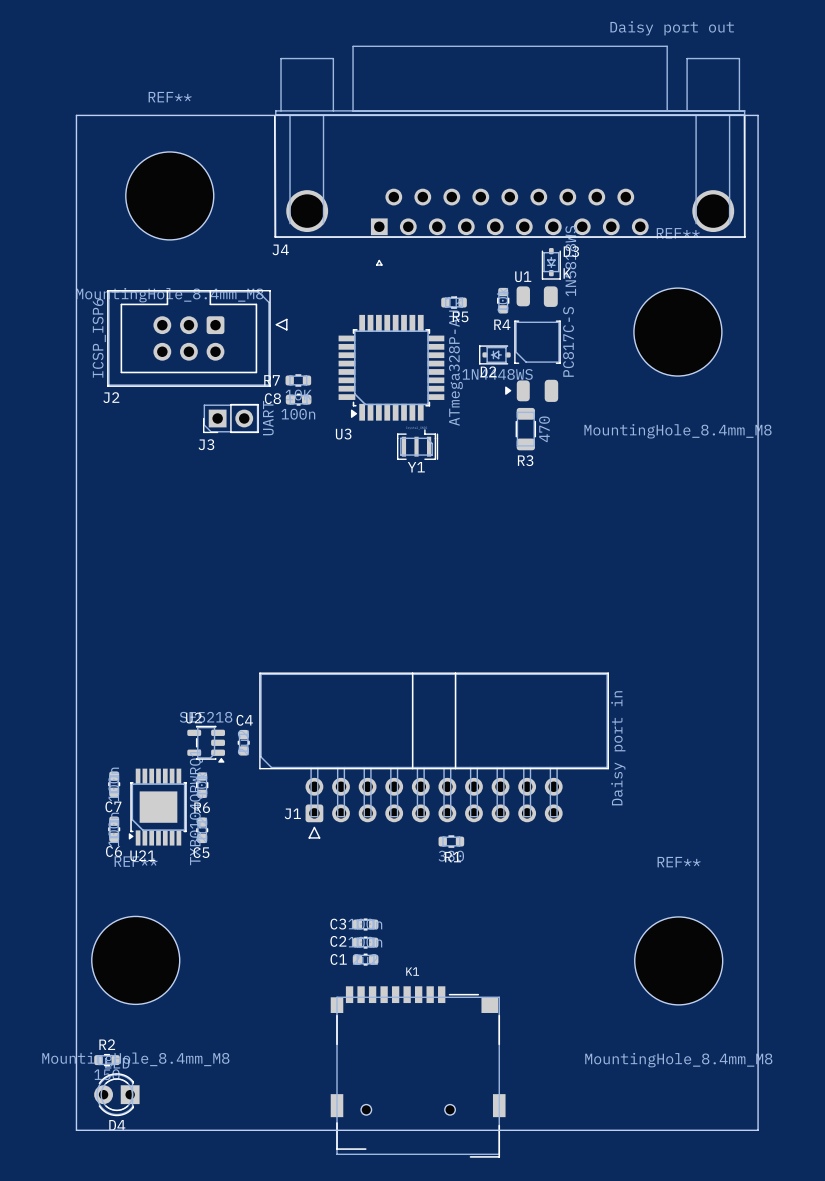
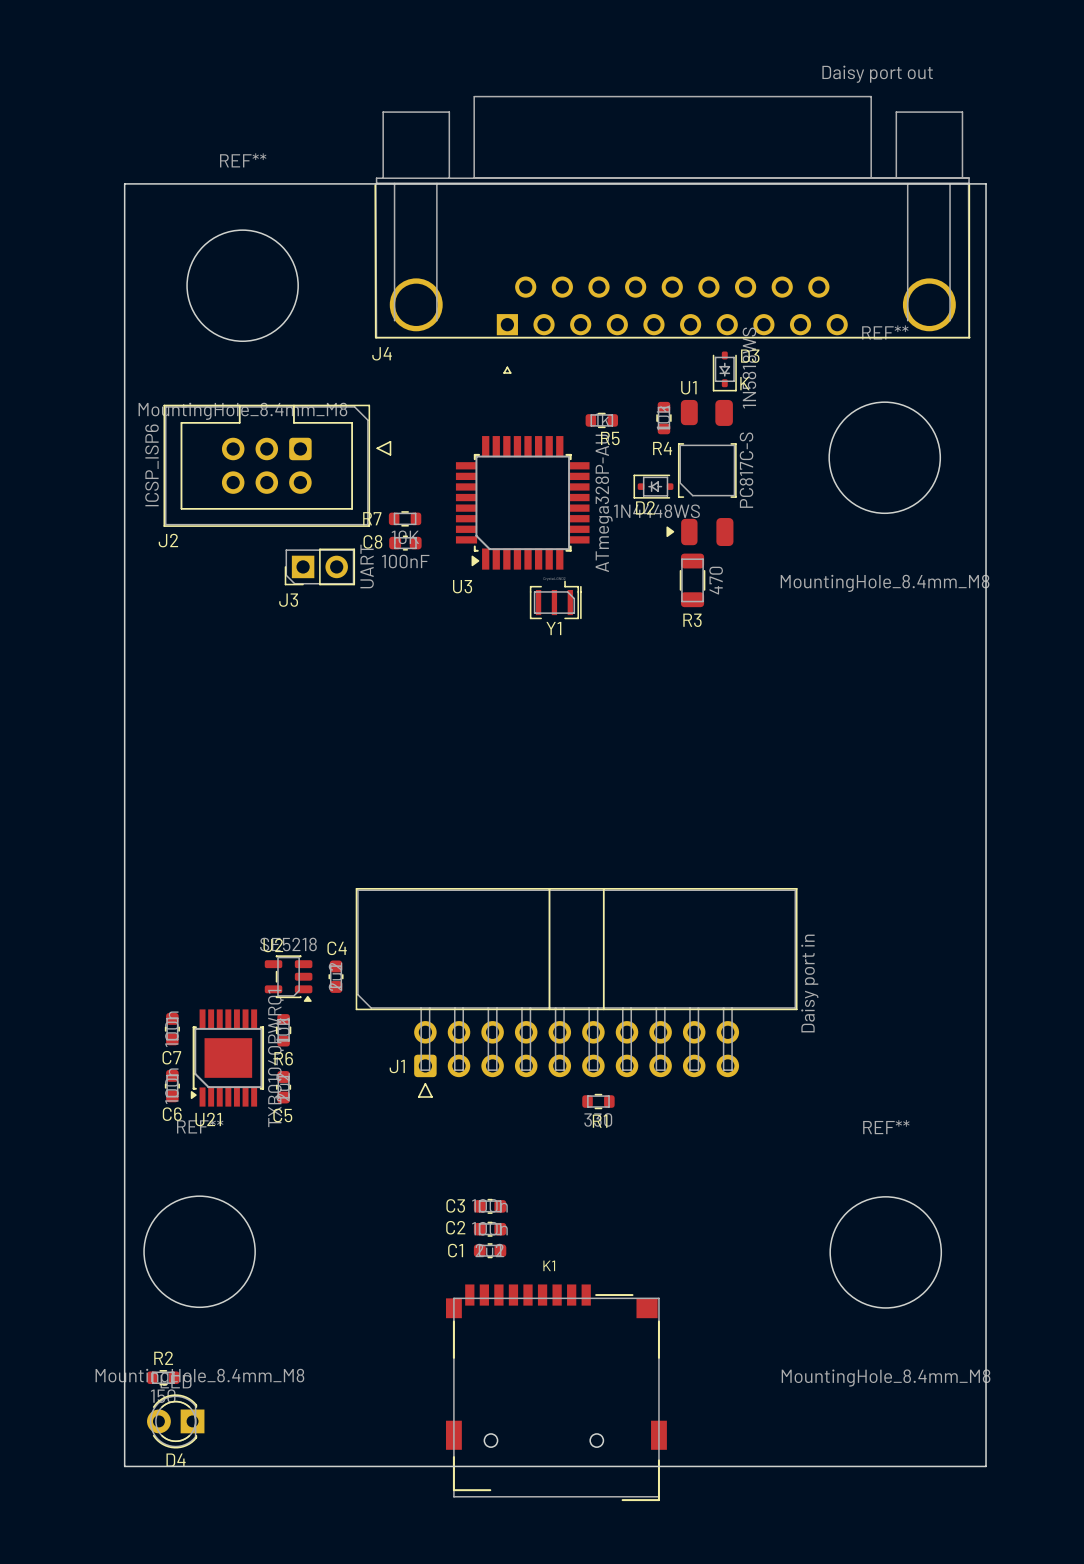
C8 value: 100n (298, 414) -> 100nF (405, 561)

